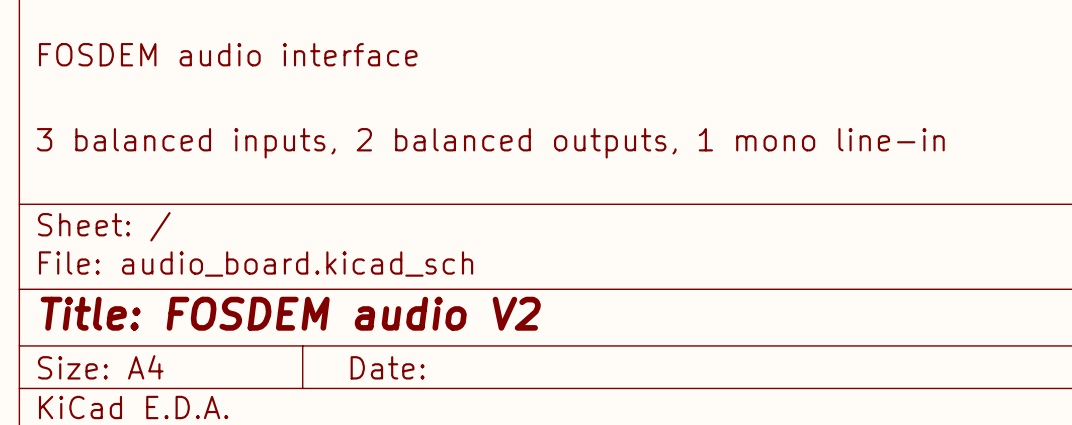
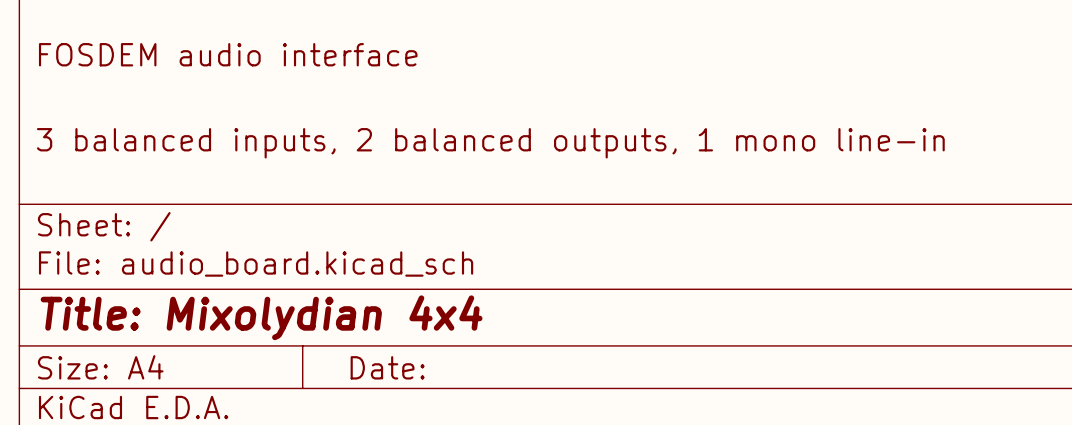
title block: Title: FOSDEM audio V2 (290, 313) -> Title: Mixolydian 4x4 (261, 317)

